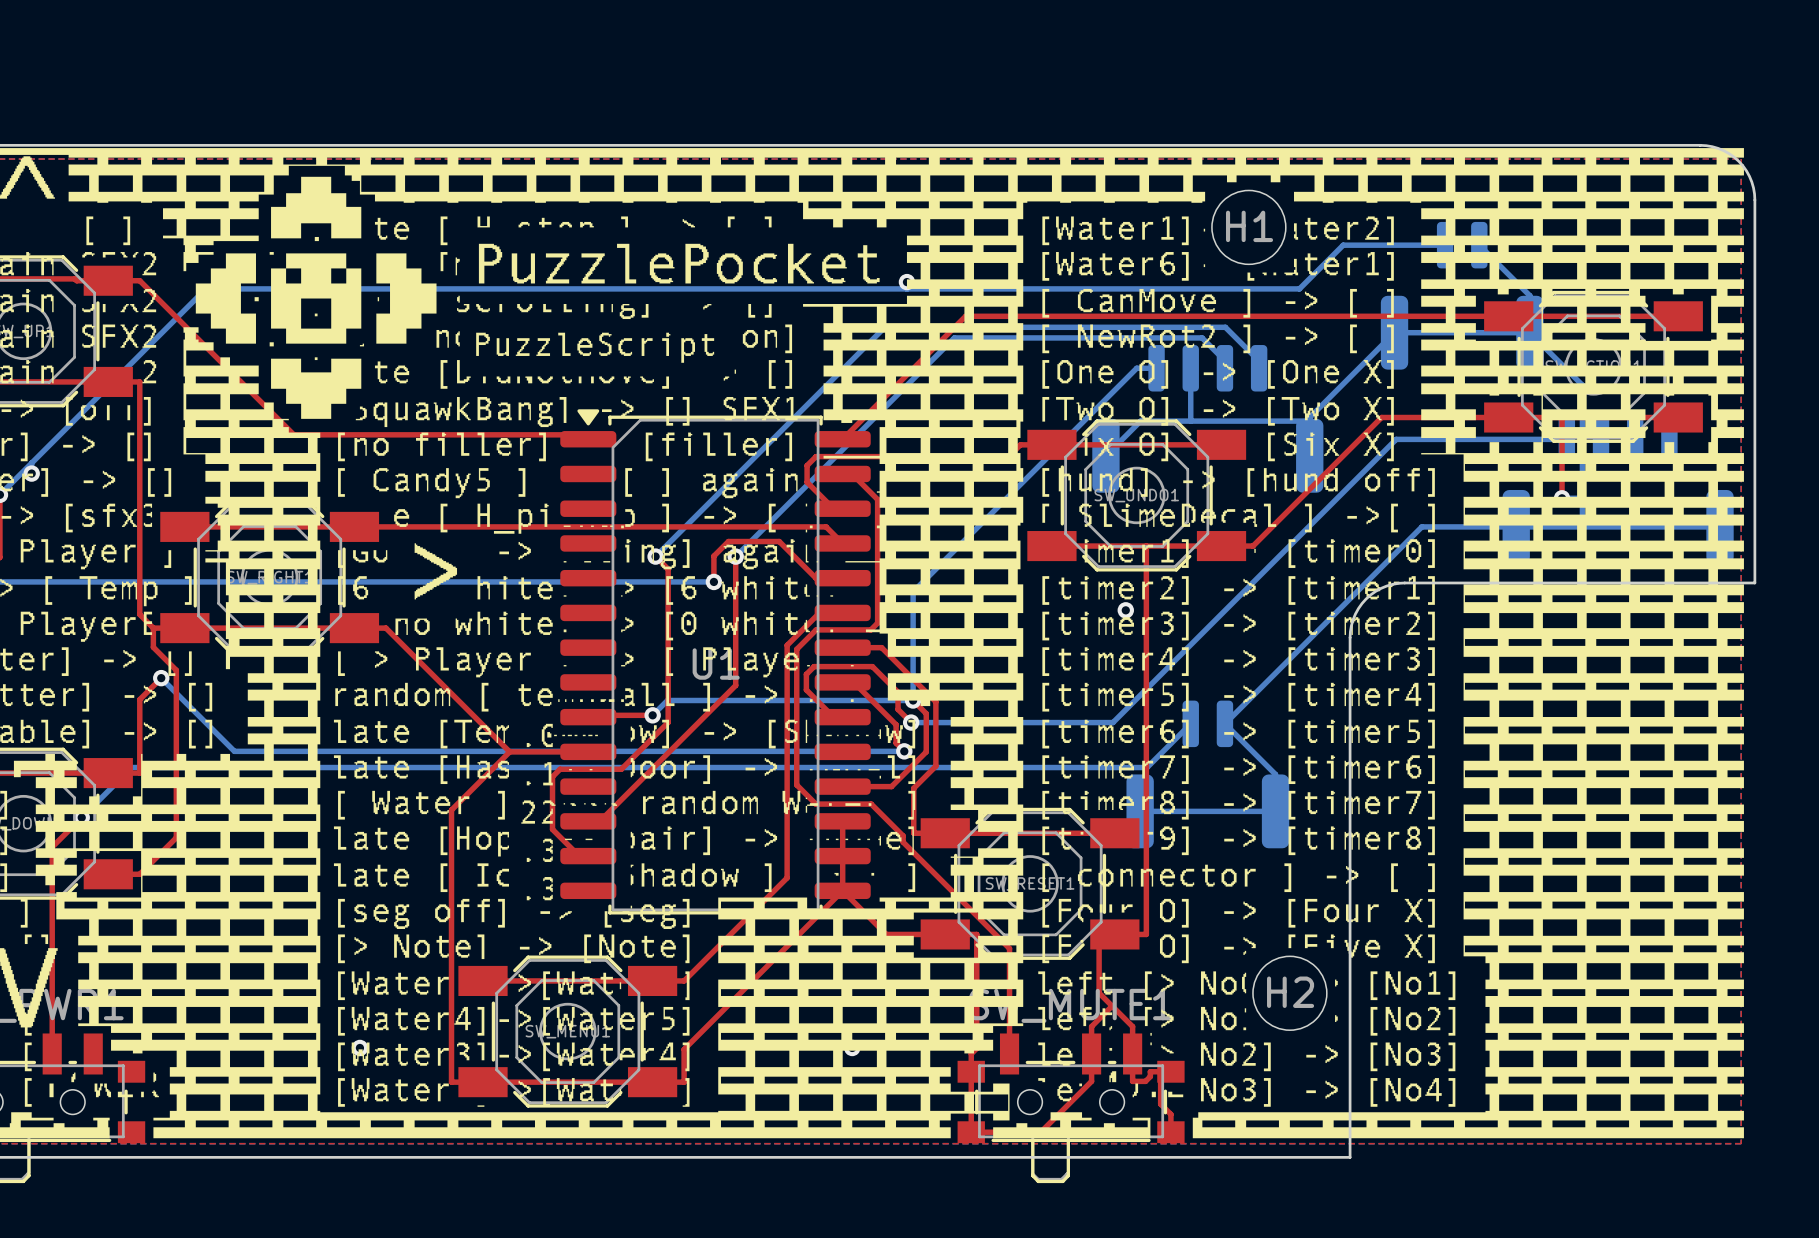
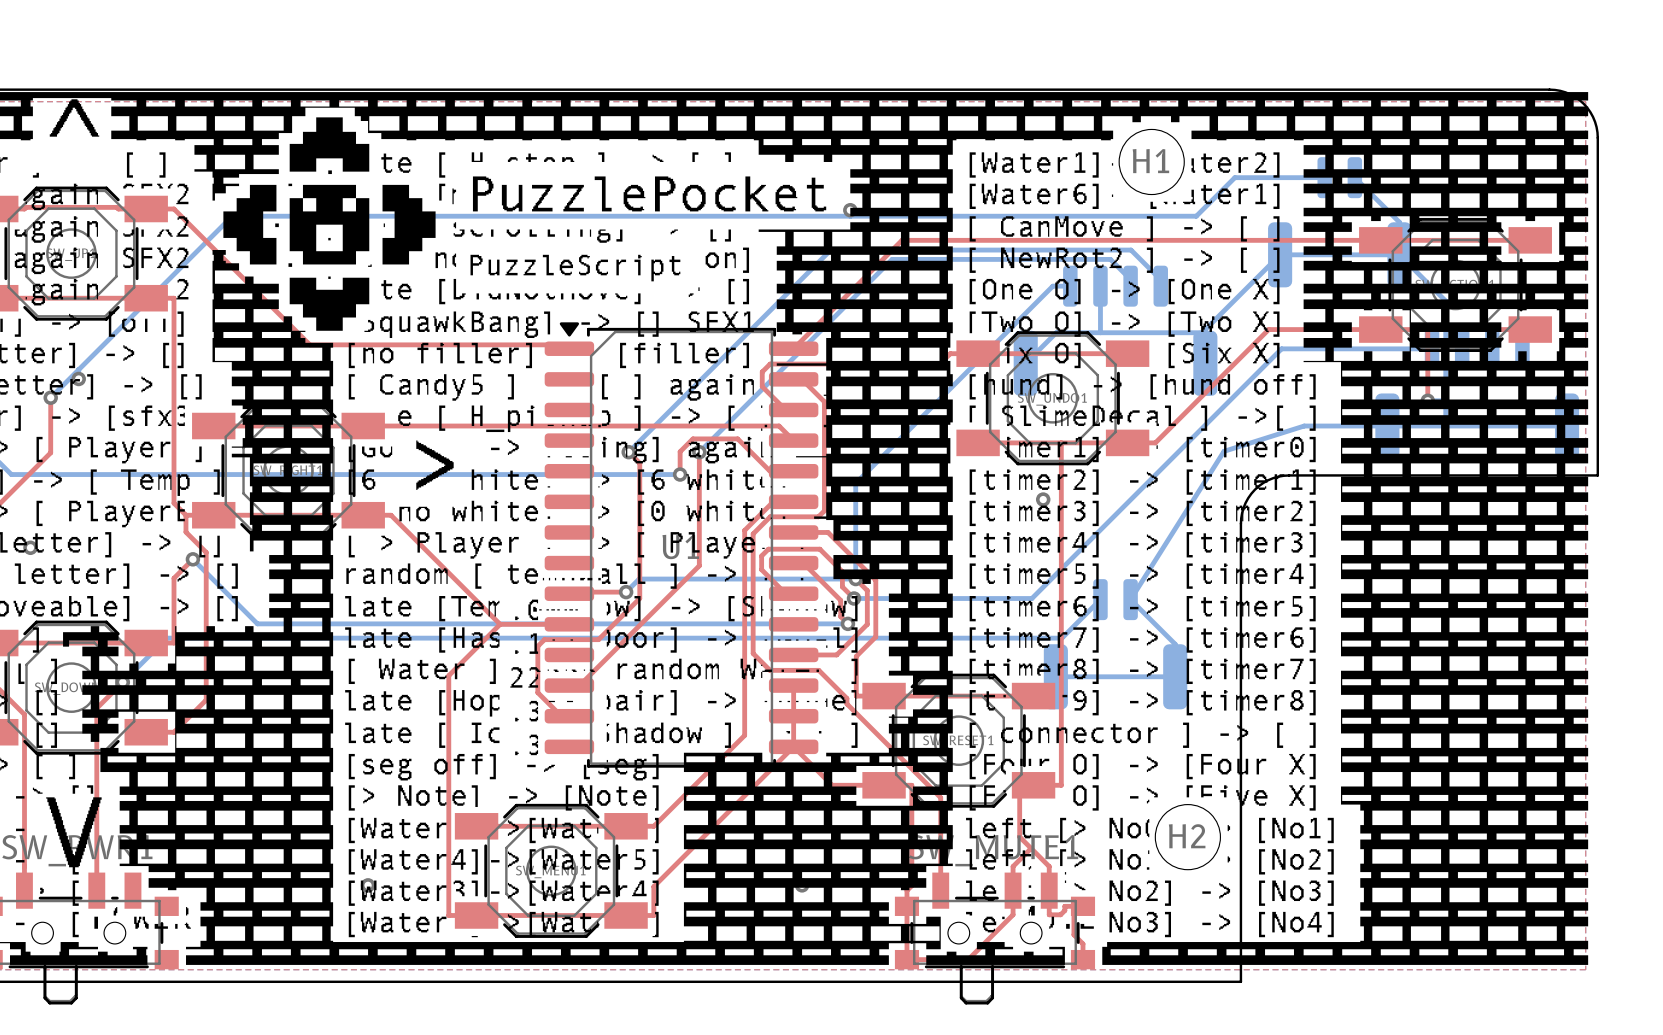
bottom track: (1421, 526) (1224, 723) -> (1304, 426) (1224, 451) (1130, 599)

